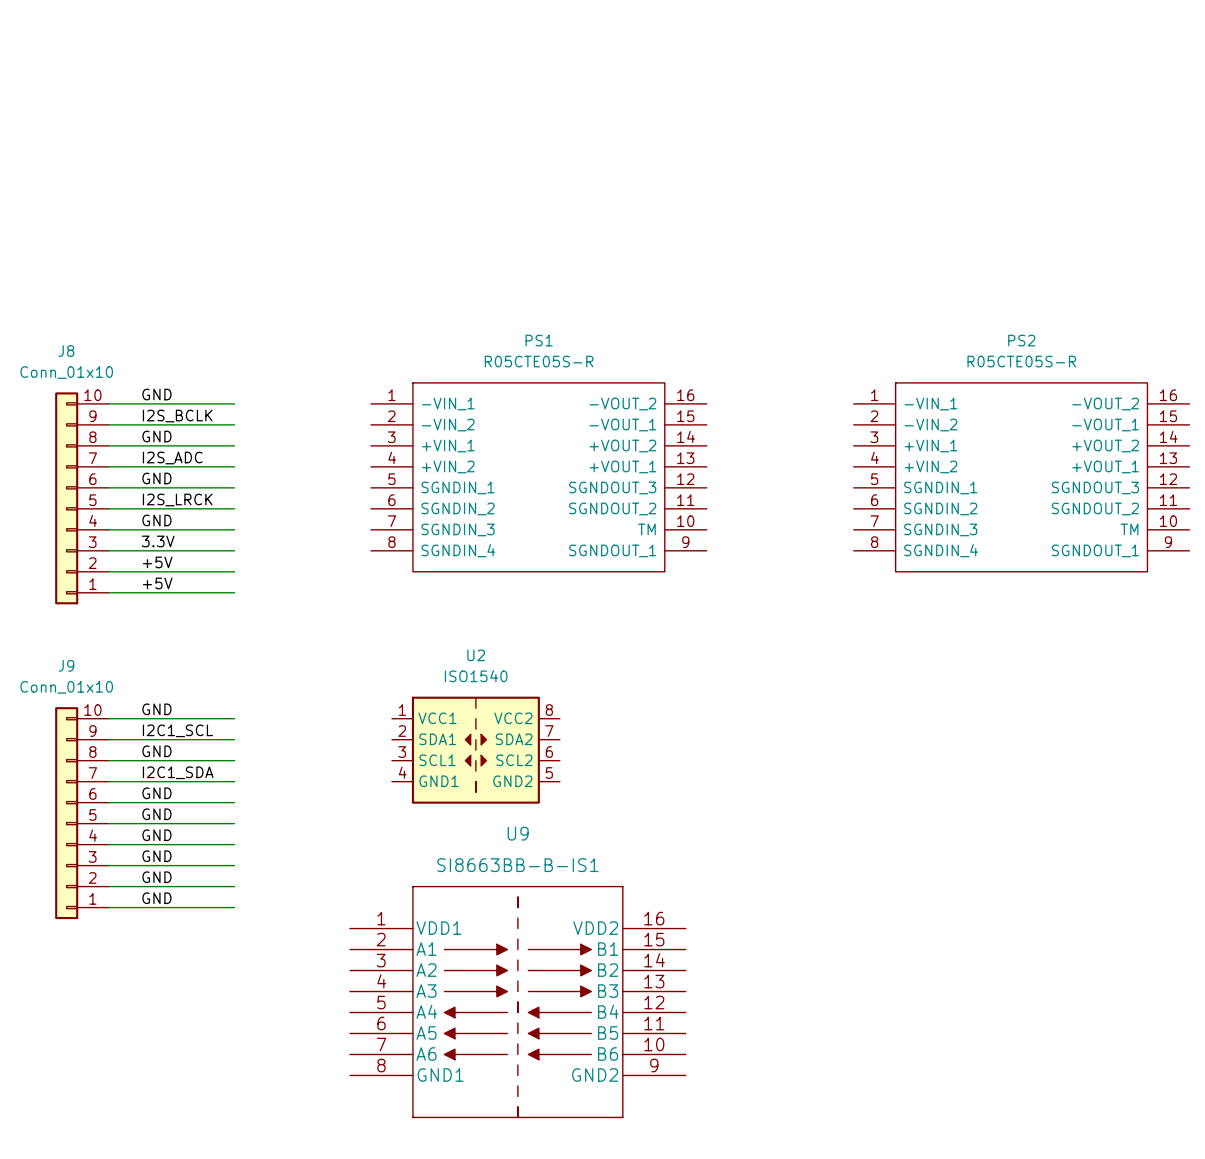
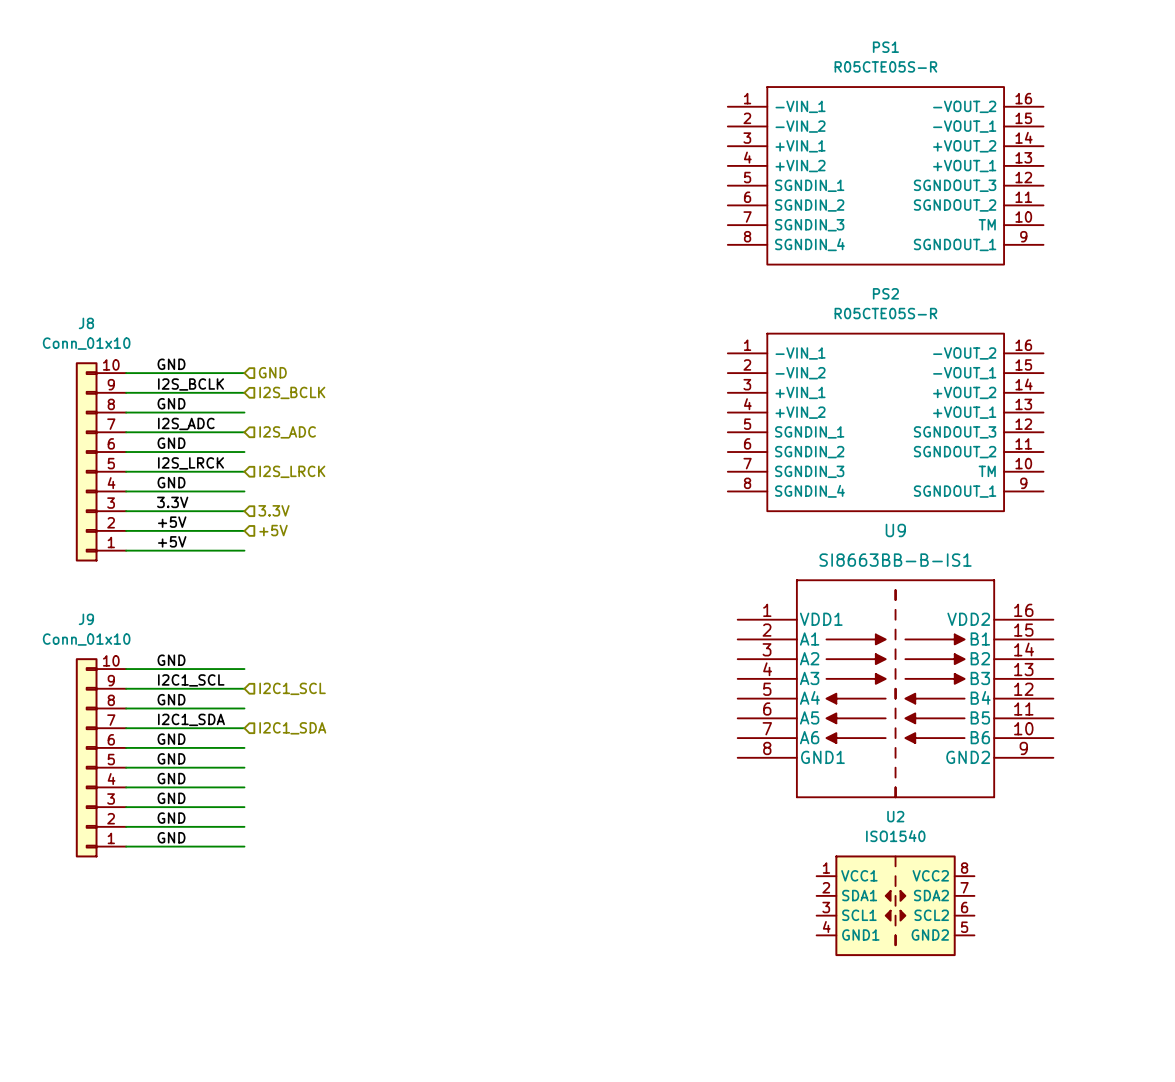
hierarchical label: none -> GND (272, 372)
hierarchical label: none -> I2S_BCLK (292, 392)
hierarchical label: none -> I2S_ADC (287, 432)
PS1 position: (538, 477) -> (885, 175)
PS2 position: (1021, 477) -> (885, 422)
hierarchical label: none -> I2S_LRCK (292, 471)
hierarchical label: none -> 3.3V (273, 510)
hierarchical label: none -> +5V (273, 530)
hierarchical label: none -> I2C1_SCL (292, 688)
U2 position: (475, 750) -> (895, 905)
hierarchical label: none -> I2C1_SDA (292, 728)
U9 position: (517, 1002) -> (895, 688)

